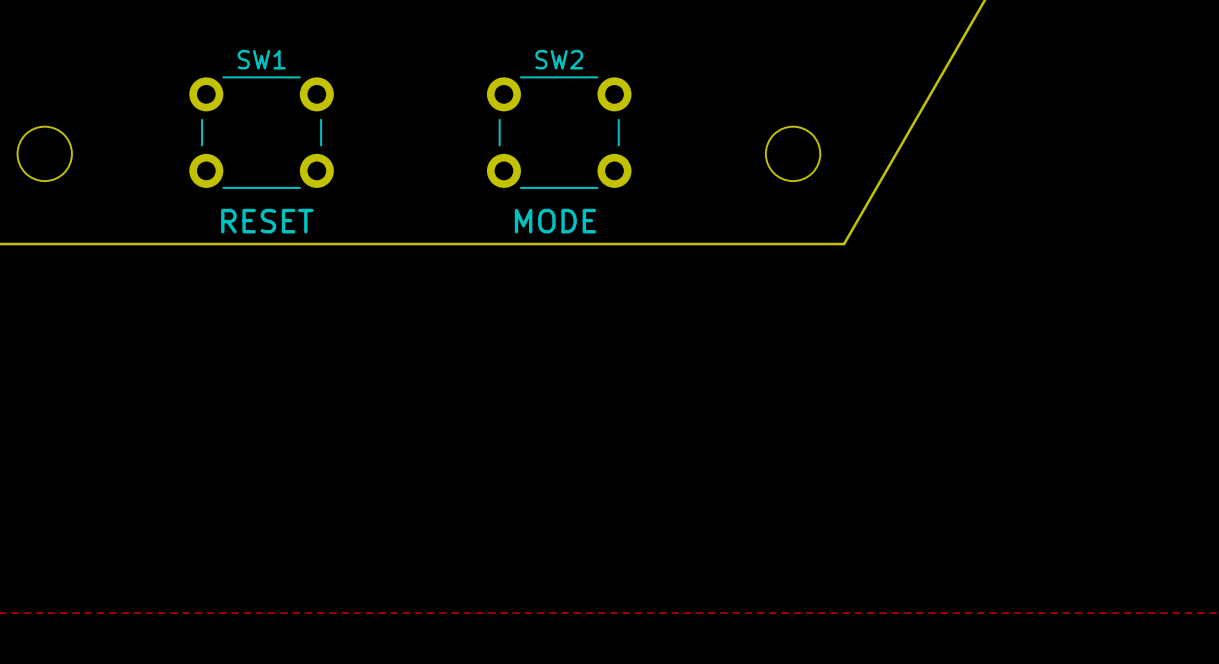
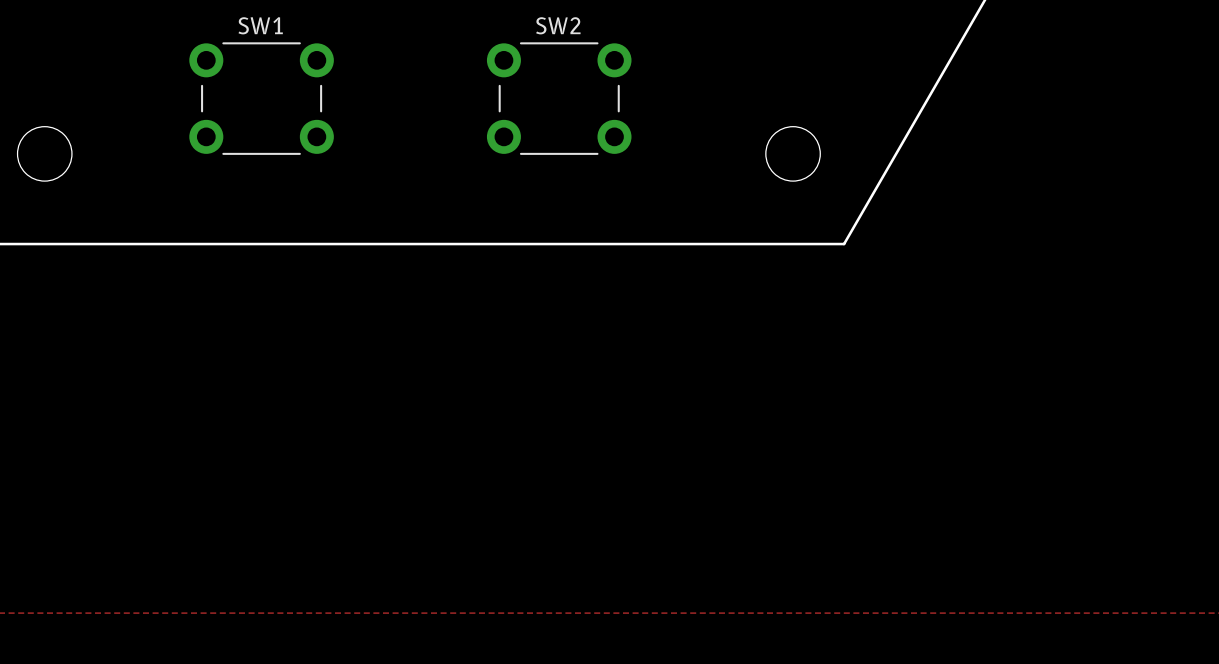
SW1 position: (261, 132) -> (261, 98)
SW2 position: (559, 132) -> (559, 98)
text: RESET (267, 221) -> none
text: MODE (555, 221) -> none

